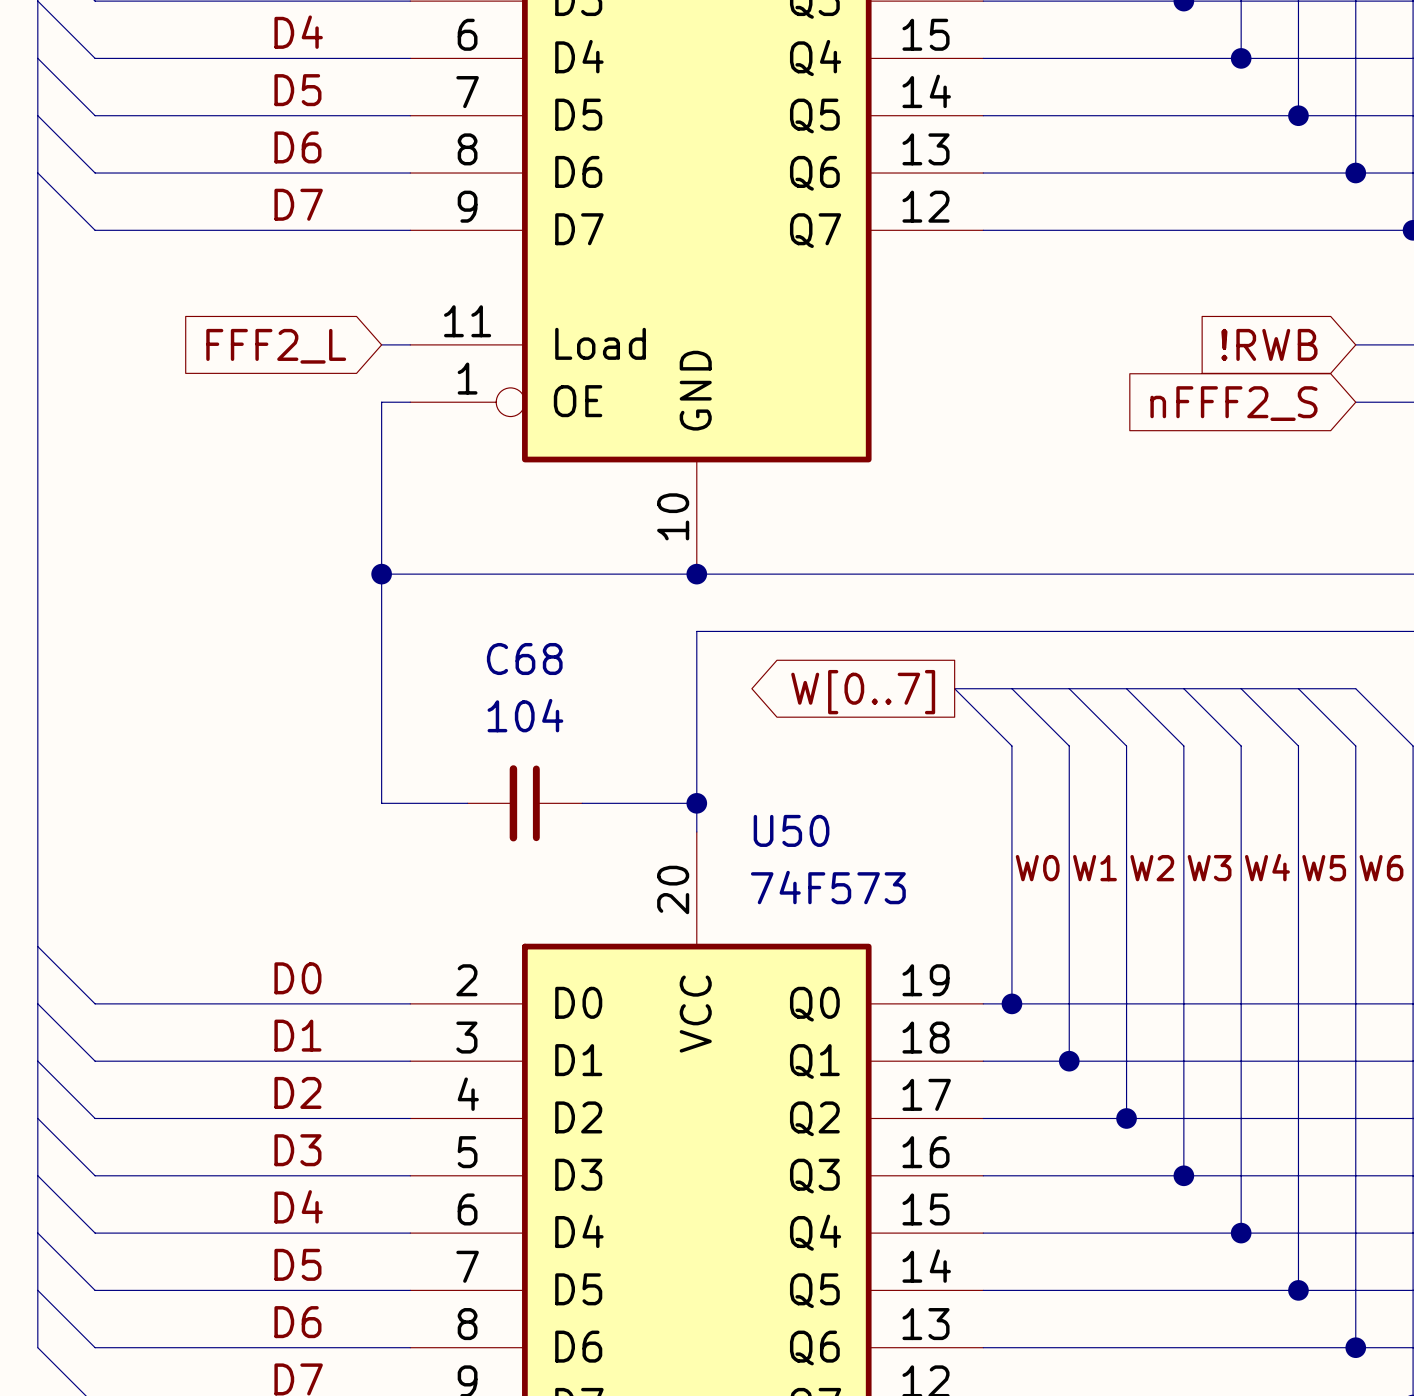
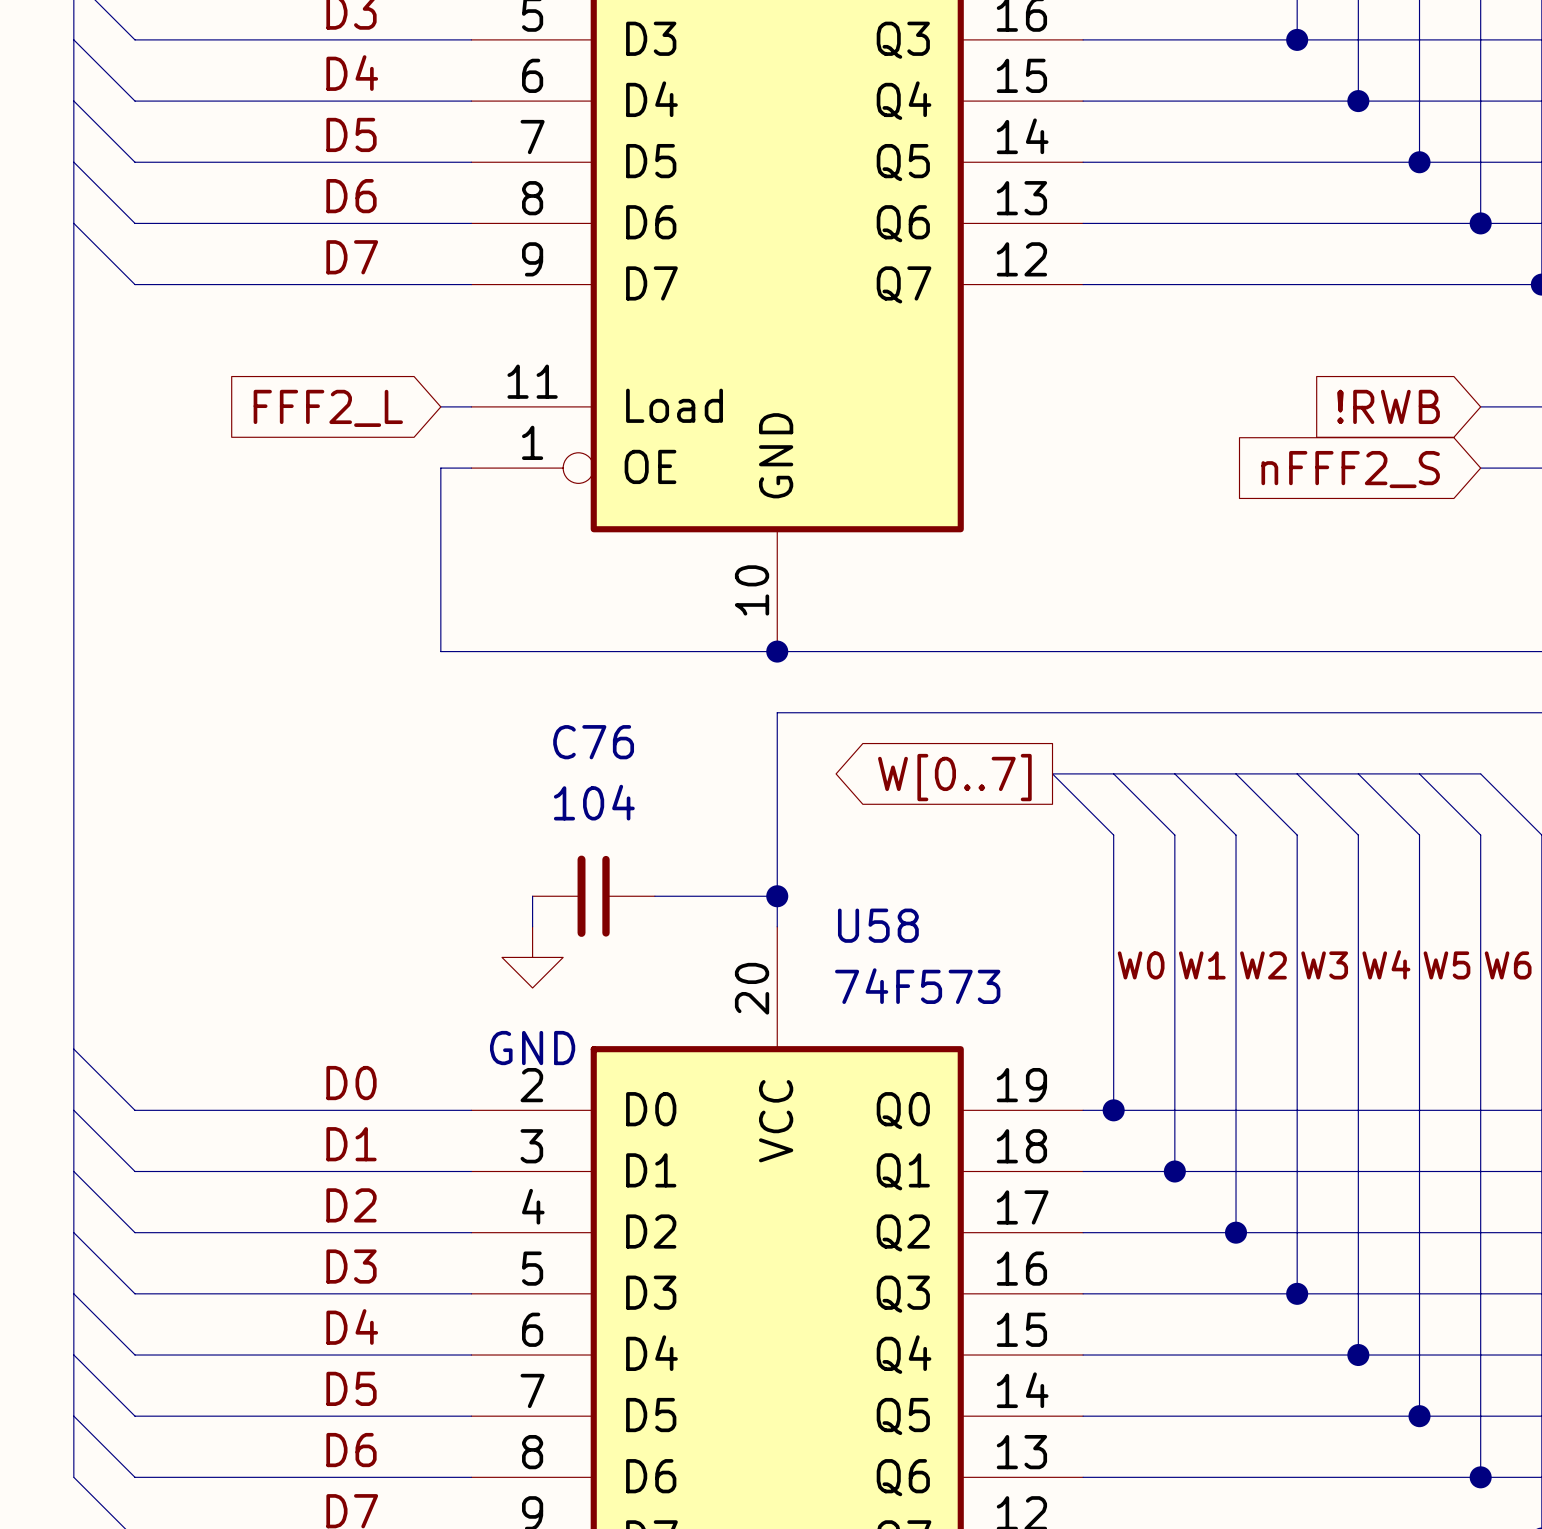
wire: (381, 574) (381, 803) (467, 803) -> (532, 926) (532, 896)
junction: (381, 574) -> none
C68 name: C68 (524, 659) -> C76 (593, 742)
U50 name: U50 (791, 830) -> U58 (878, 925)
power symbol: none -> GND (532, 957)

